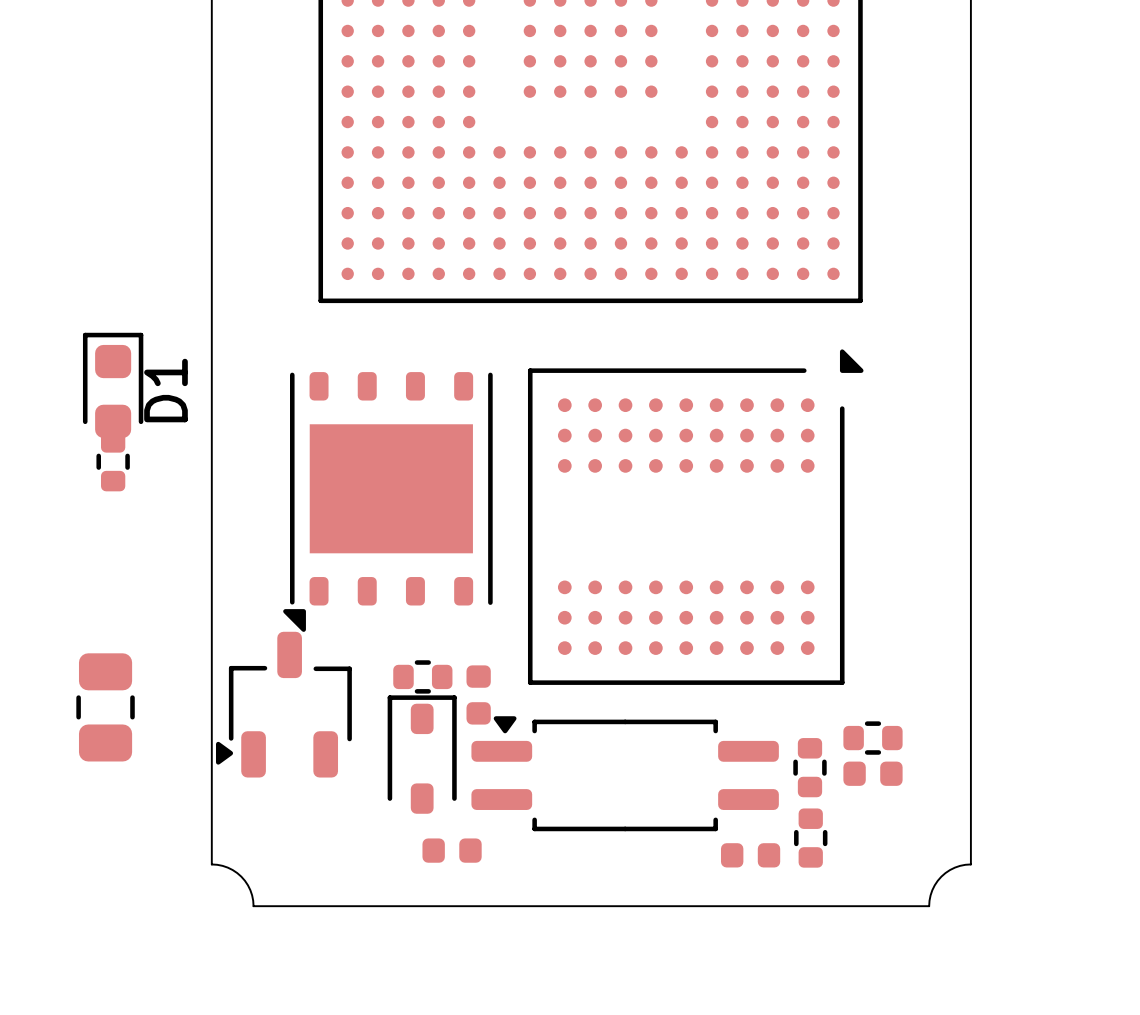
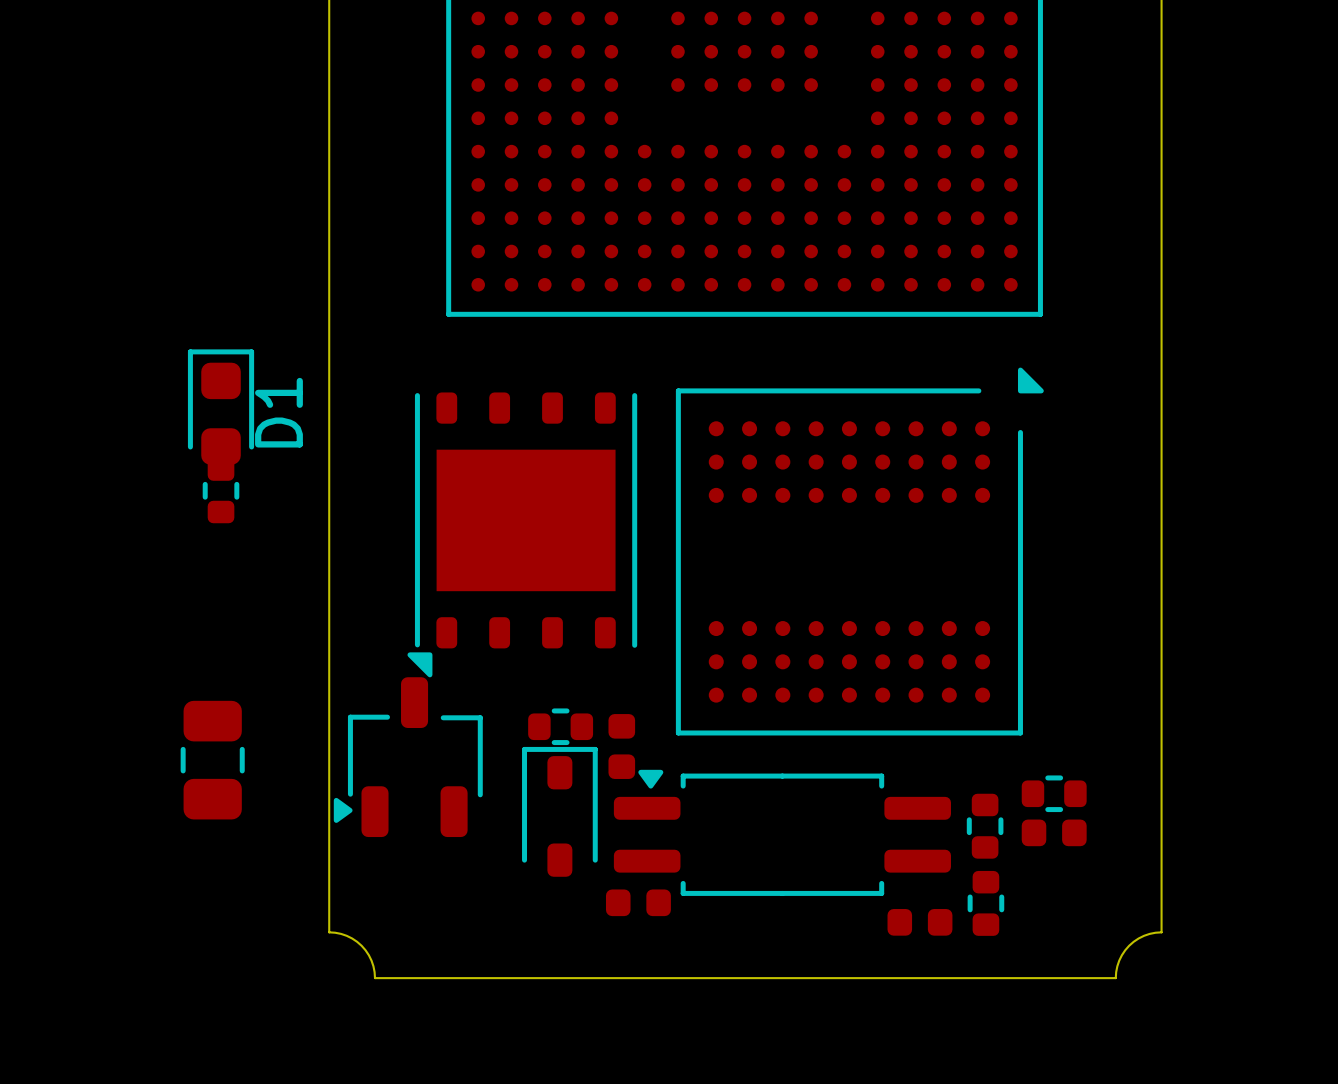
part position: (452, 850) -> (638, 902)

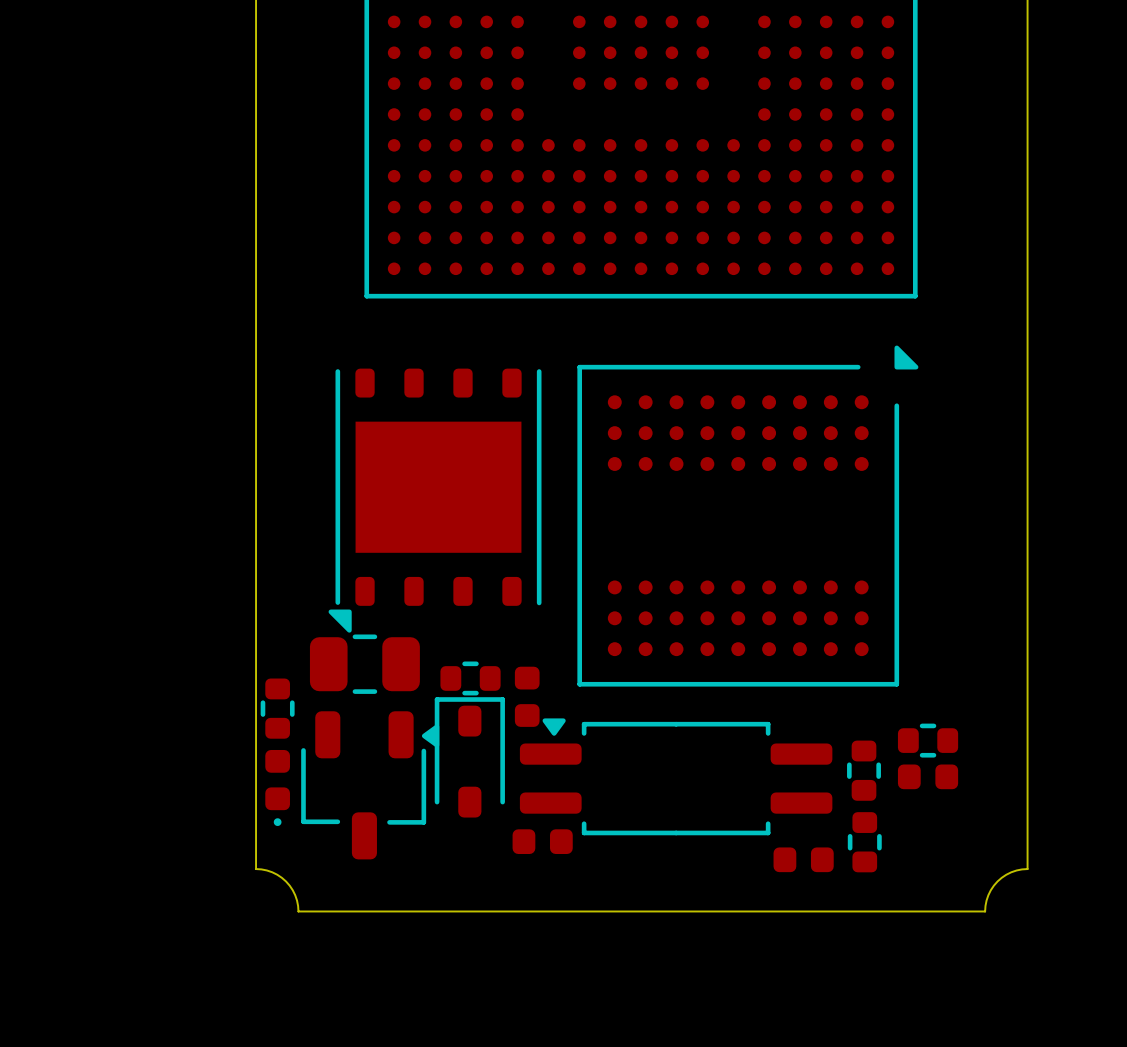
D1: (221, 407) -> none
part position: (221, 490) -> (277, 708)
part rotation: 0° (408, 757) -> 180° (370, 785)
part rotation: 0° (212, 760) -> 90° clockwise (364, 664)
part position: (212, 760) -> (364, 664)
part: none -> (277, 787)

